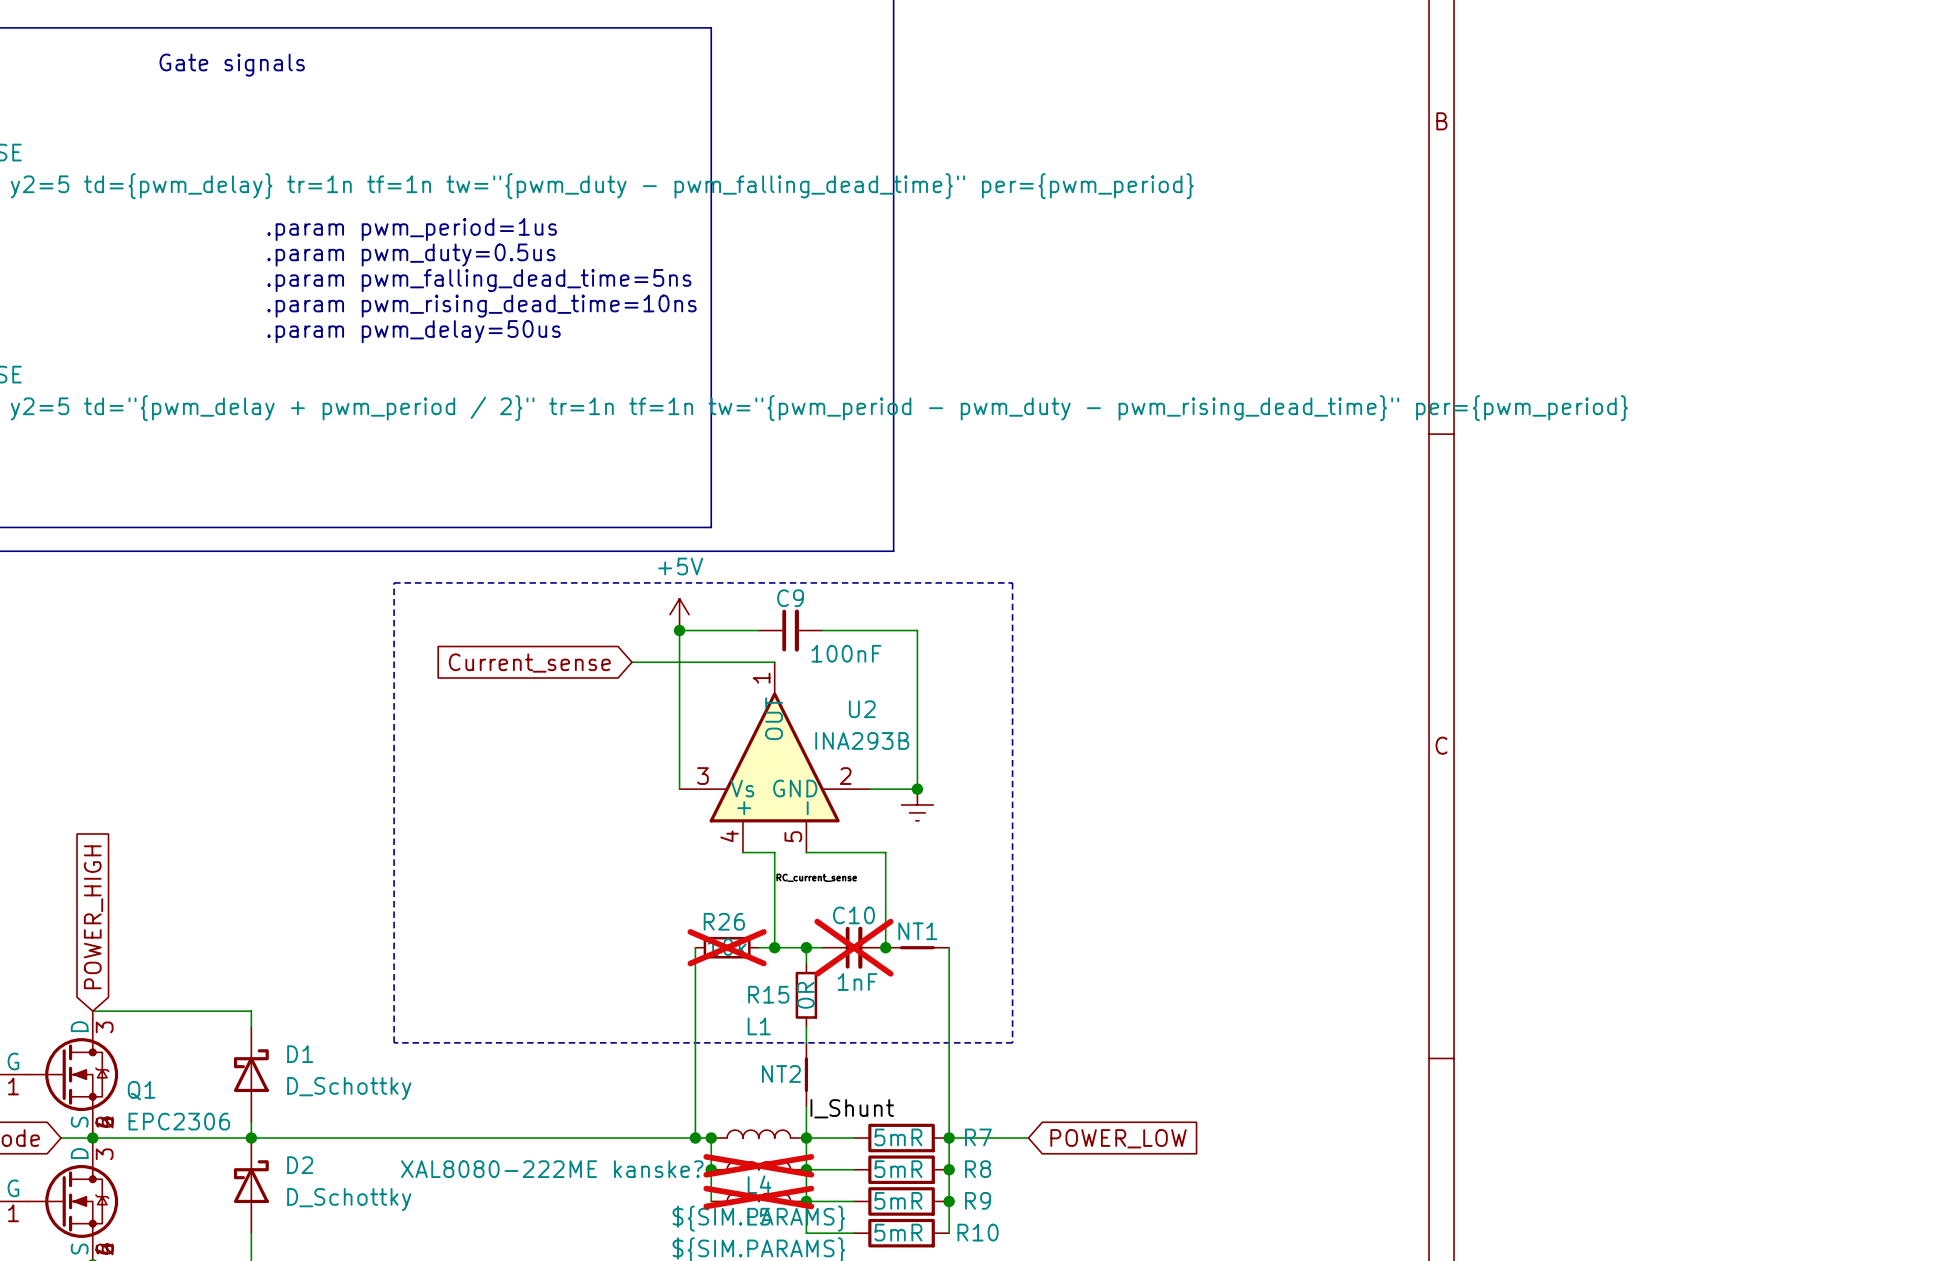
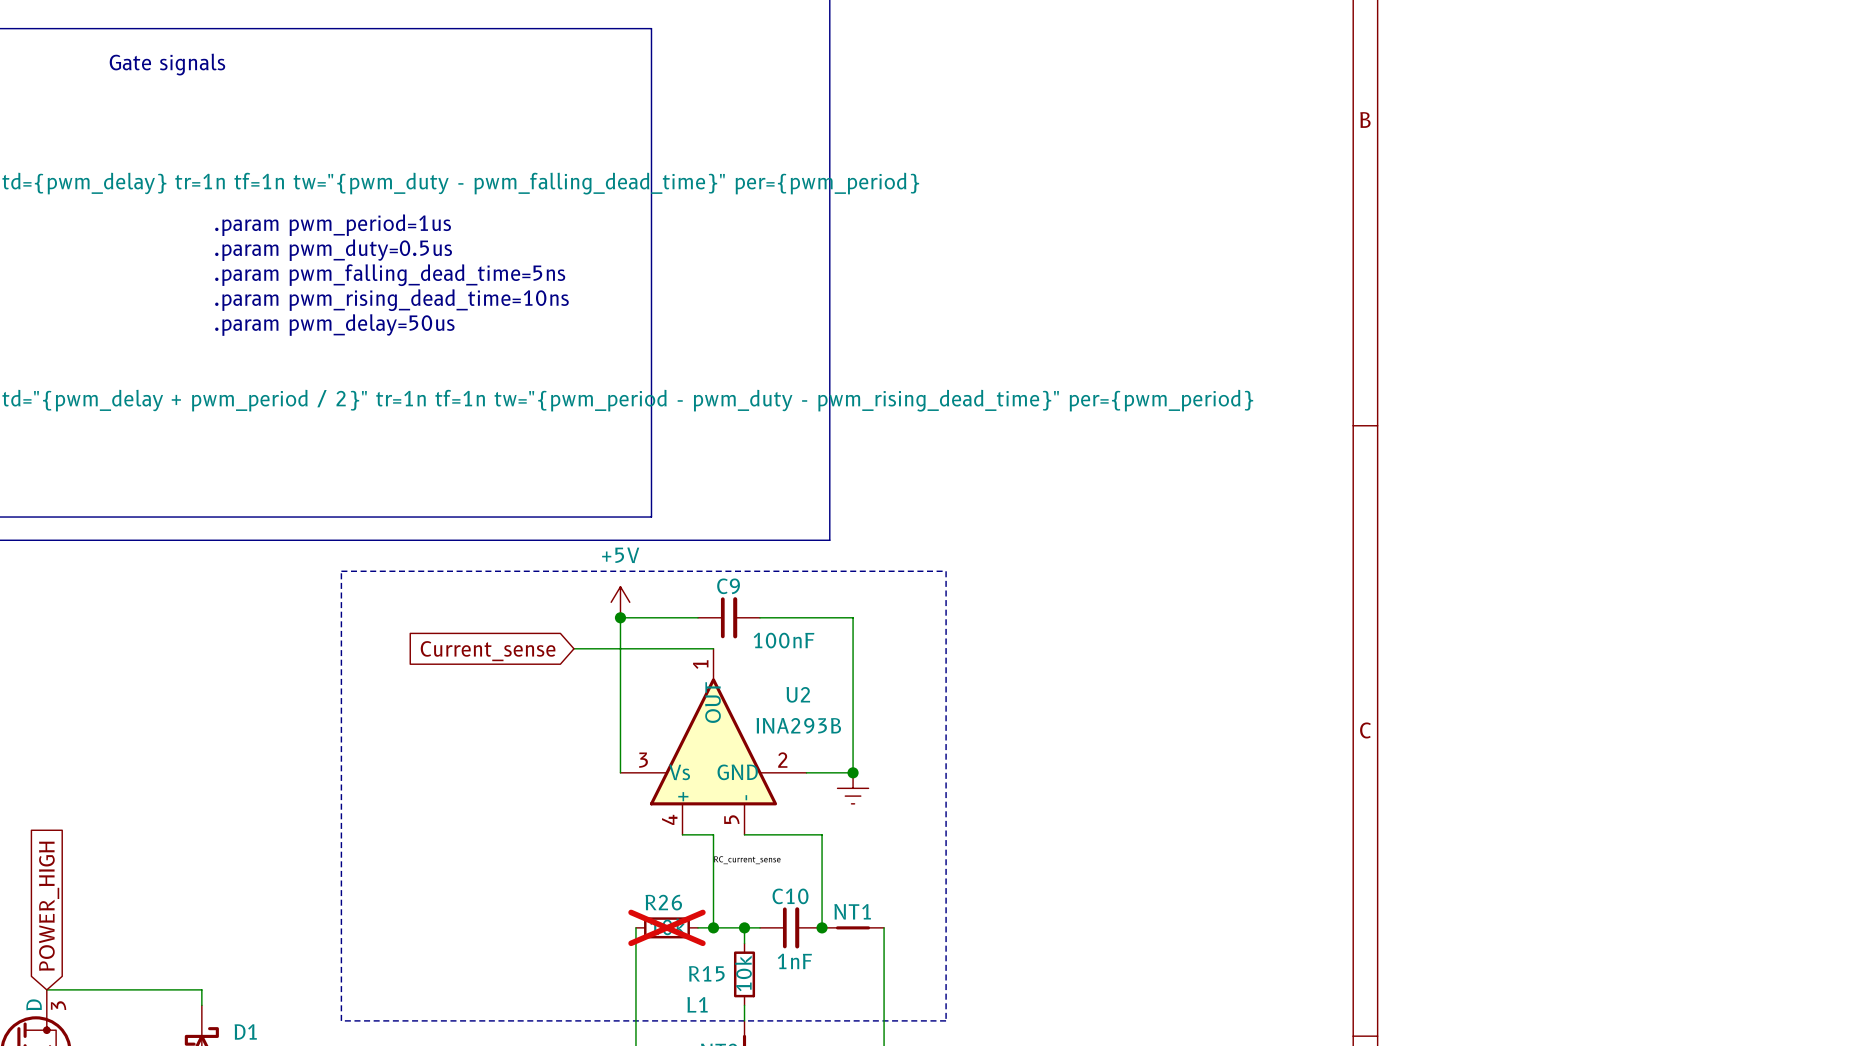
C10 do-not-place cross: (853, 947) -> none
R15 value: 0R (805, 995) -> 10k (743, 973)

